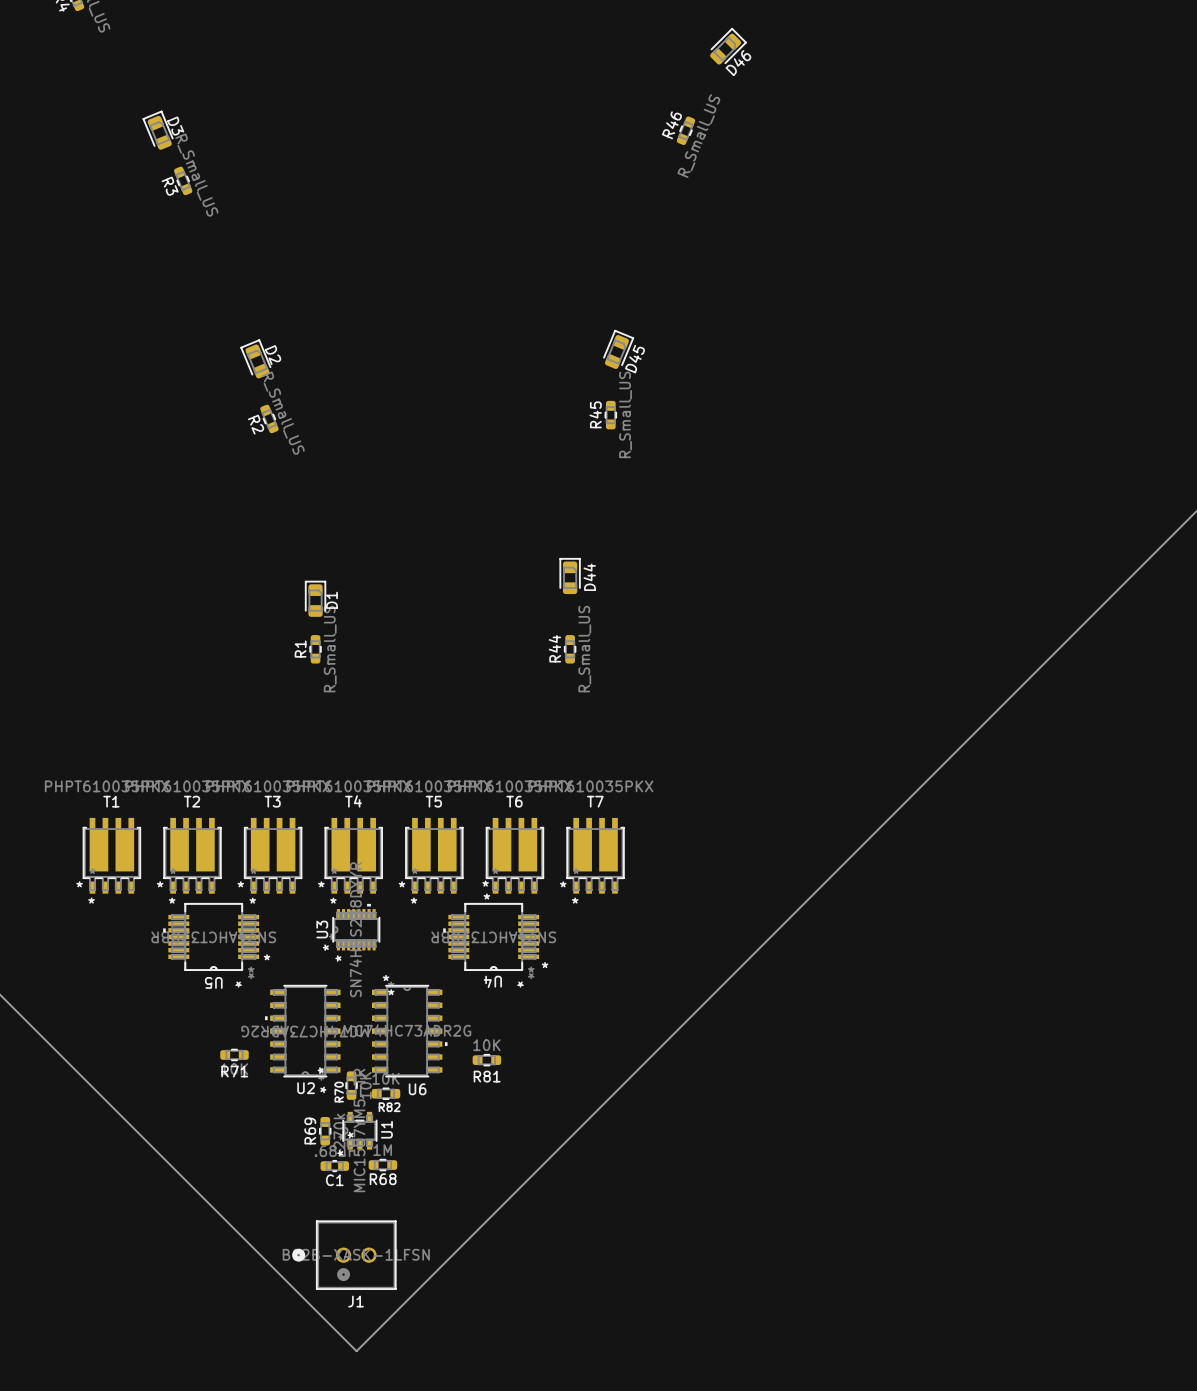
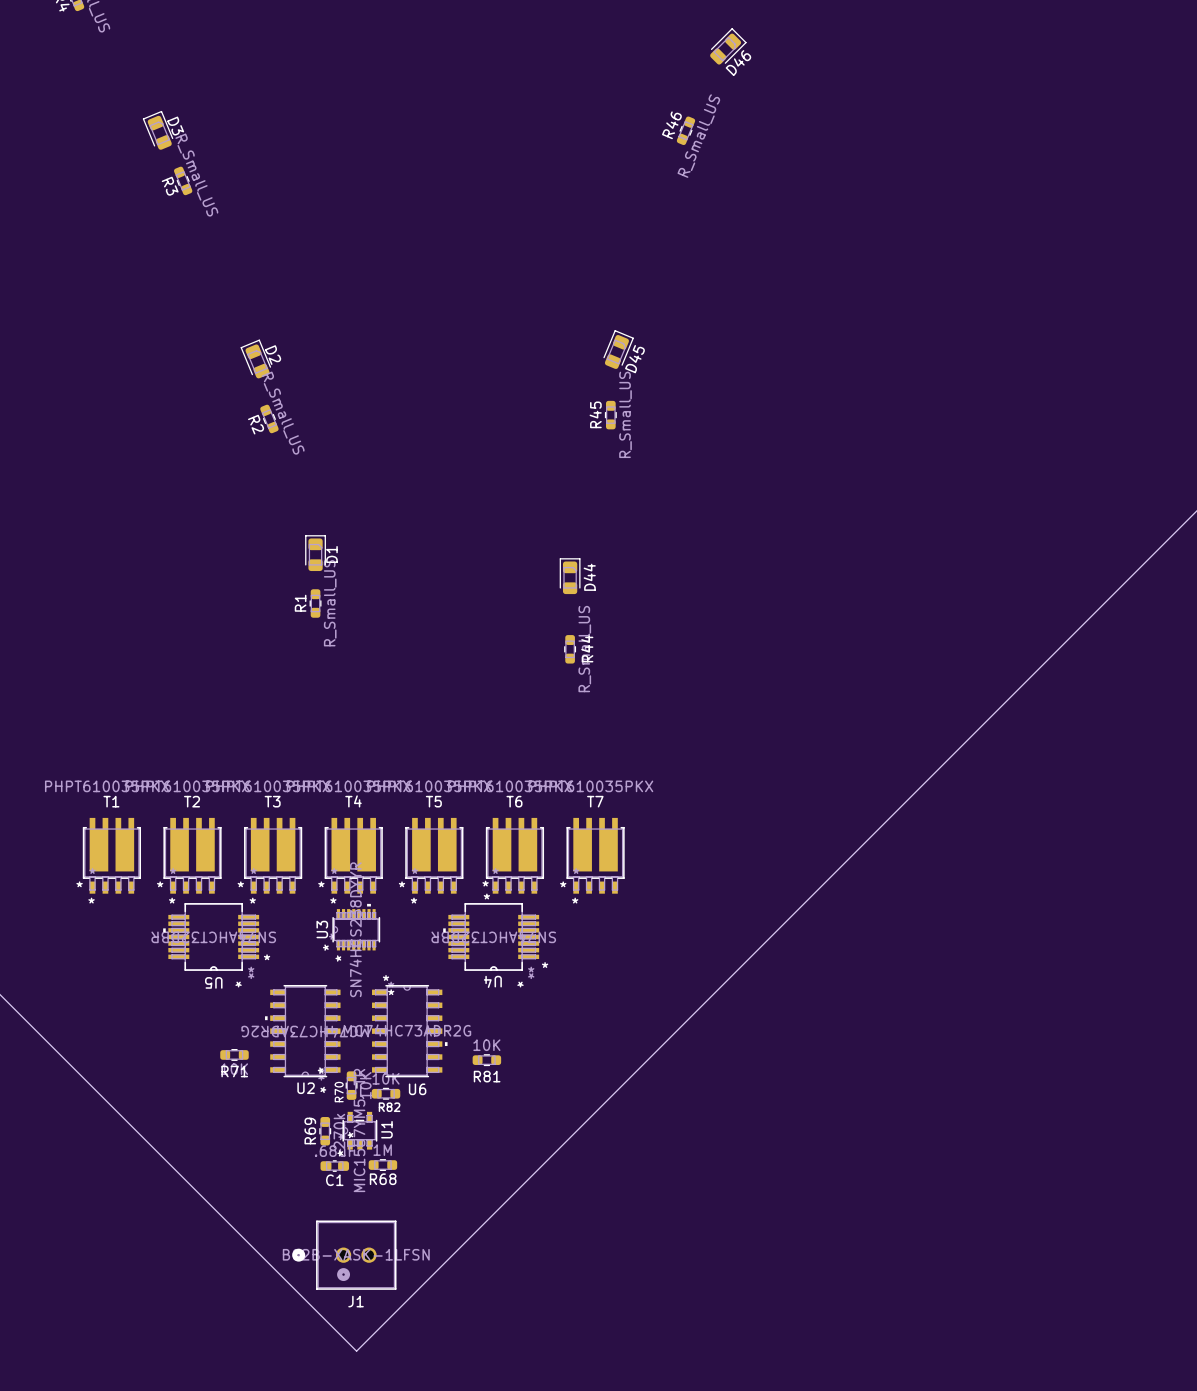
D1 position: (315, 598) -> (315, 553)
R44 name position: R44 (554, 648) -> R44 (587, 648)
R1 position: (315, 649) -> (315, 603)

